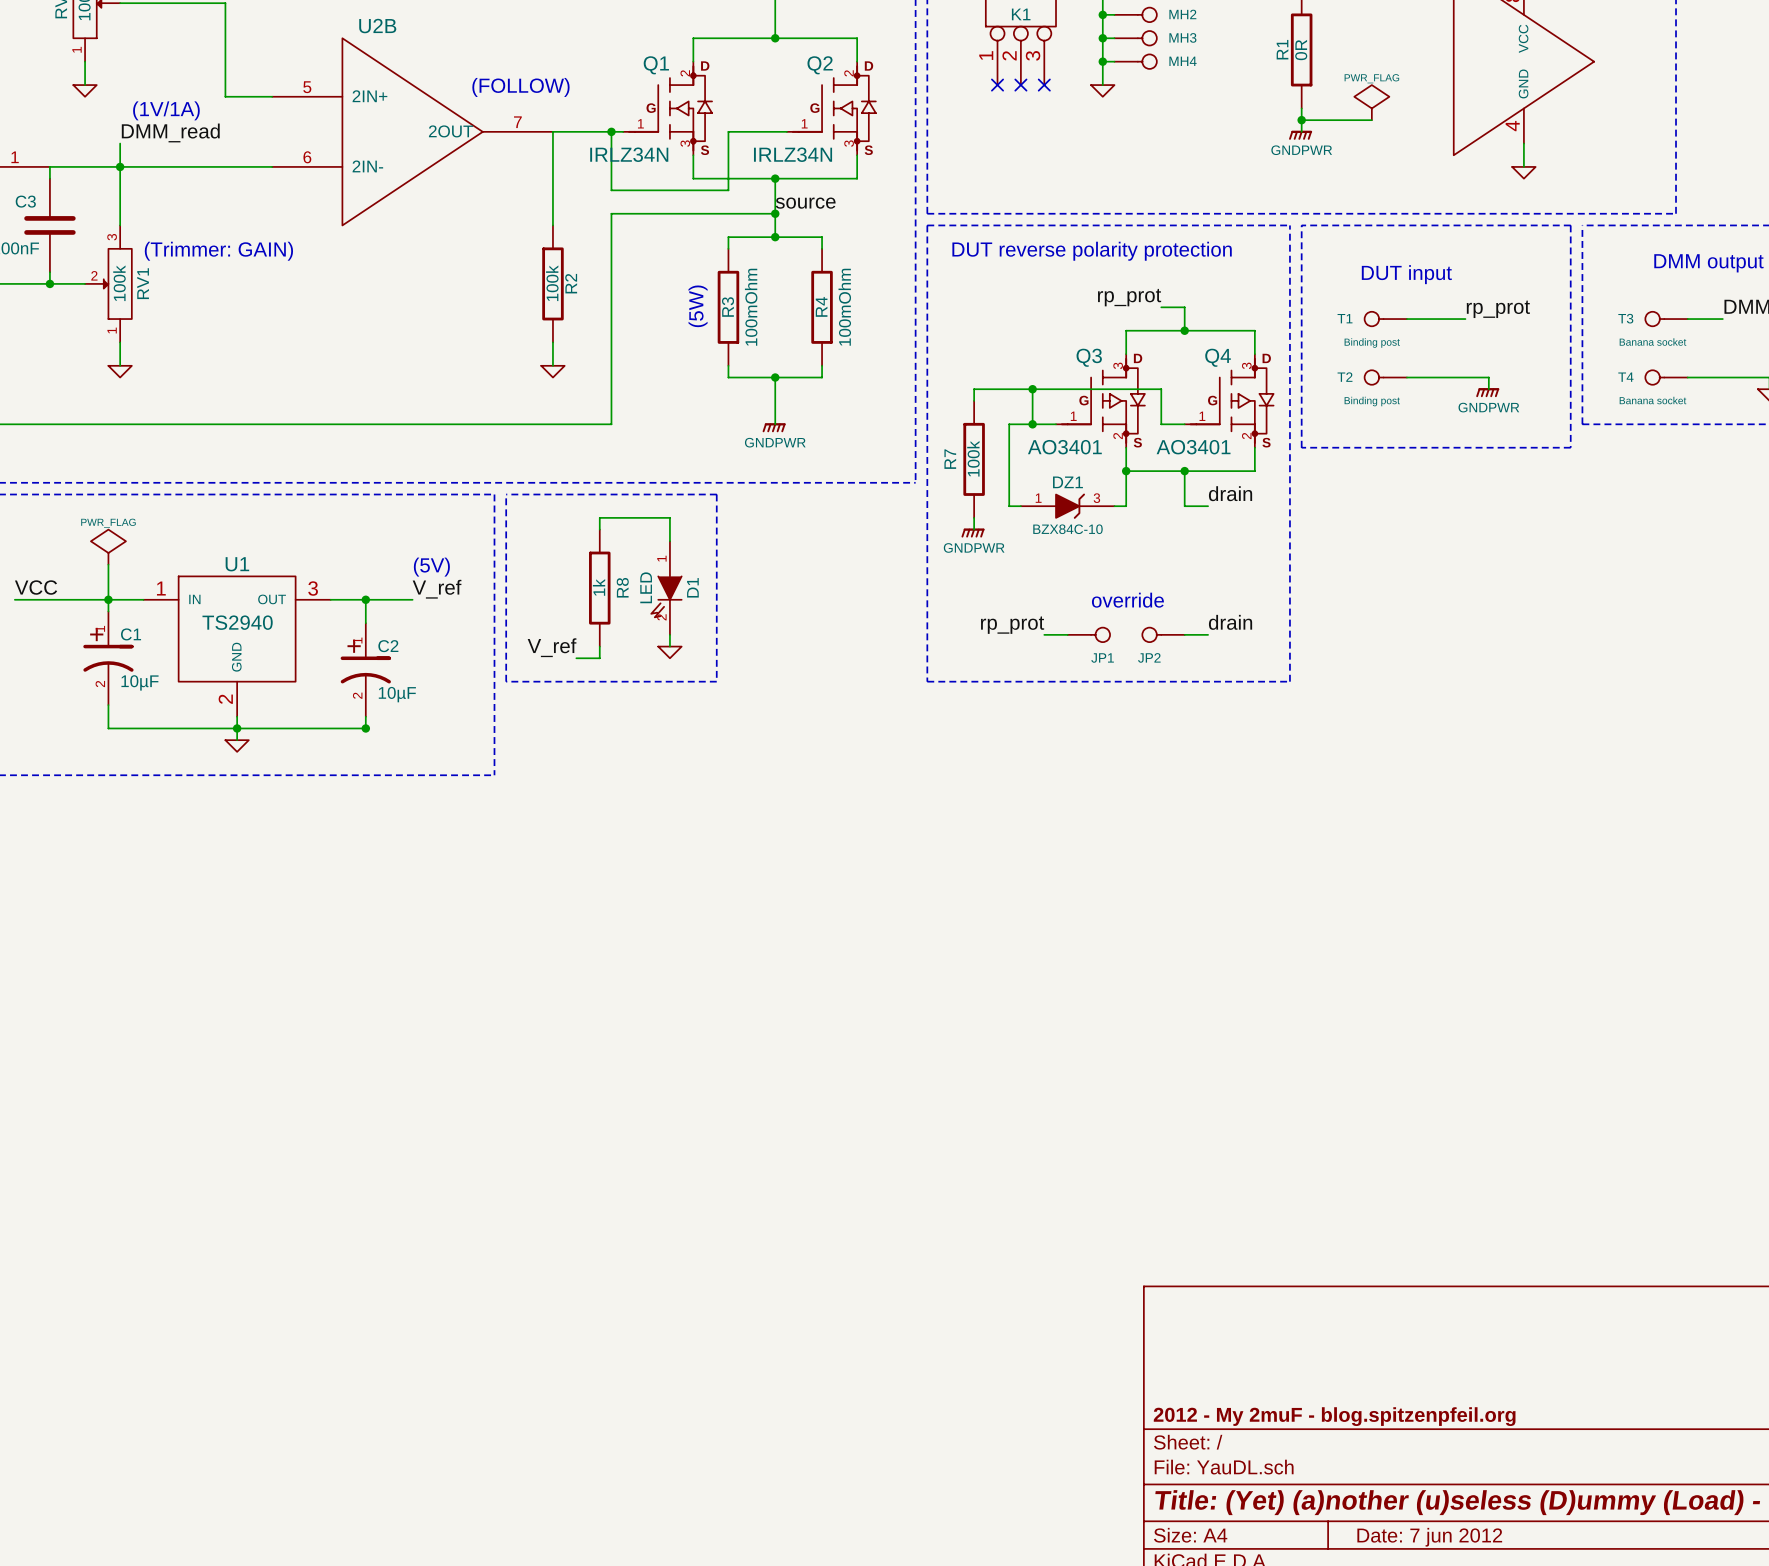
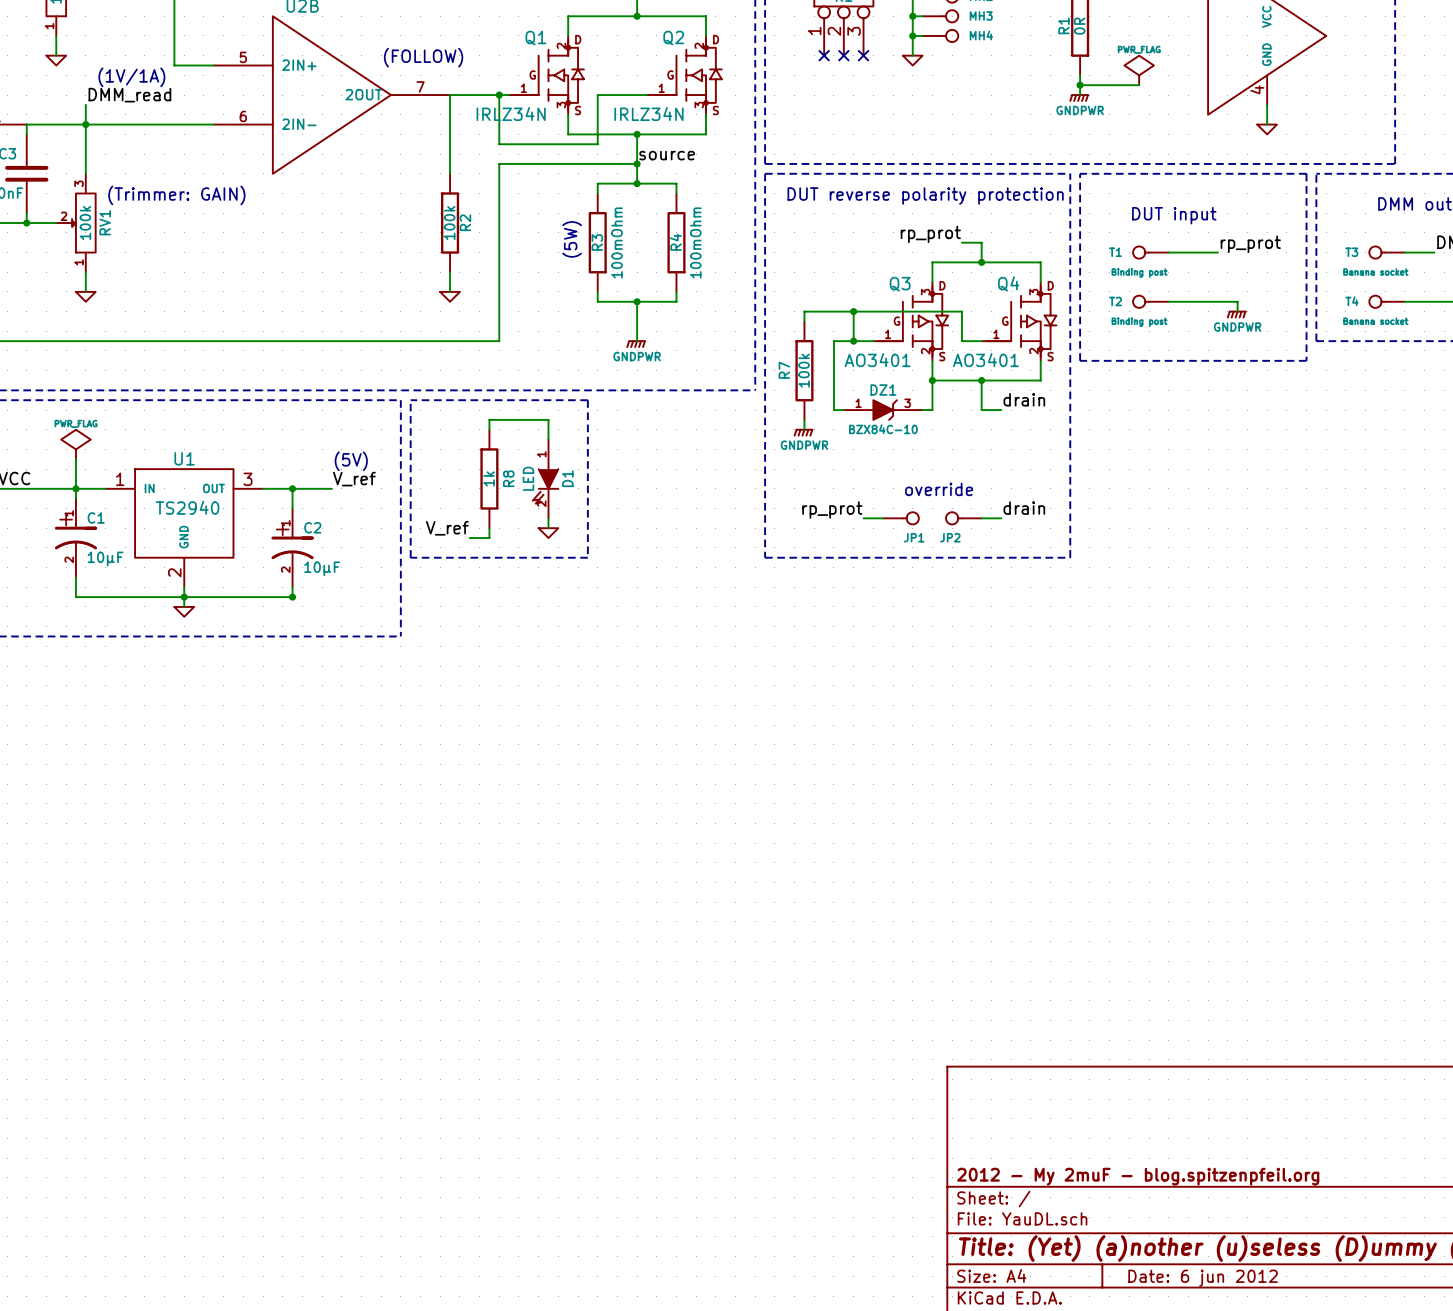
title block: Date: 7 jun 2012 (1429, 1537) -> Date: 6 jun 2012 (1203, 1278)

